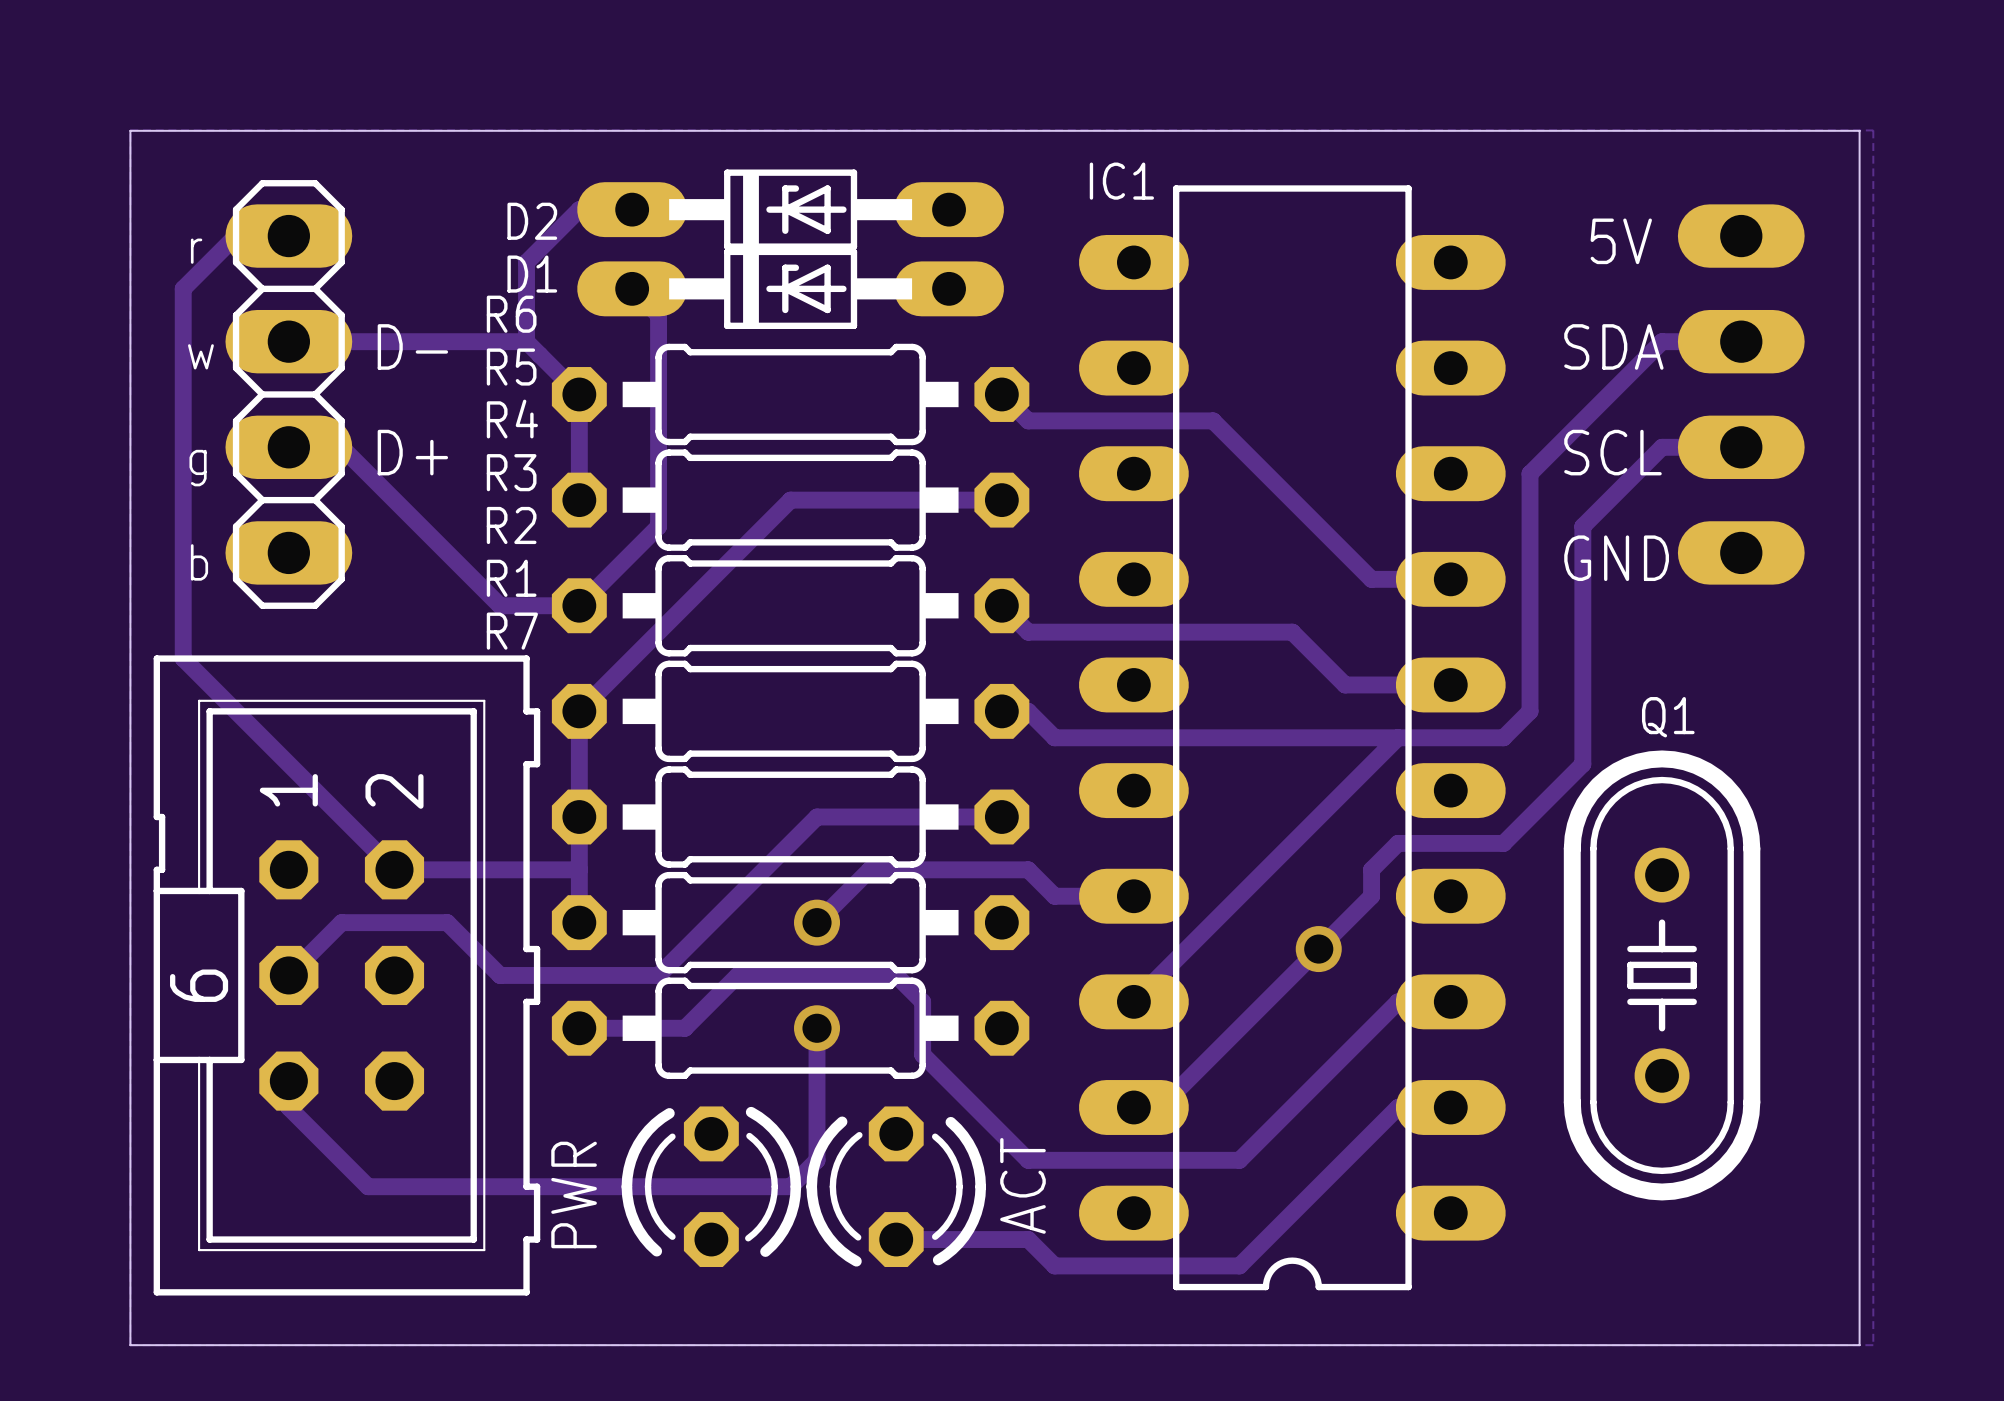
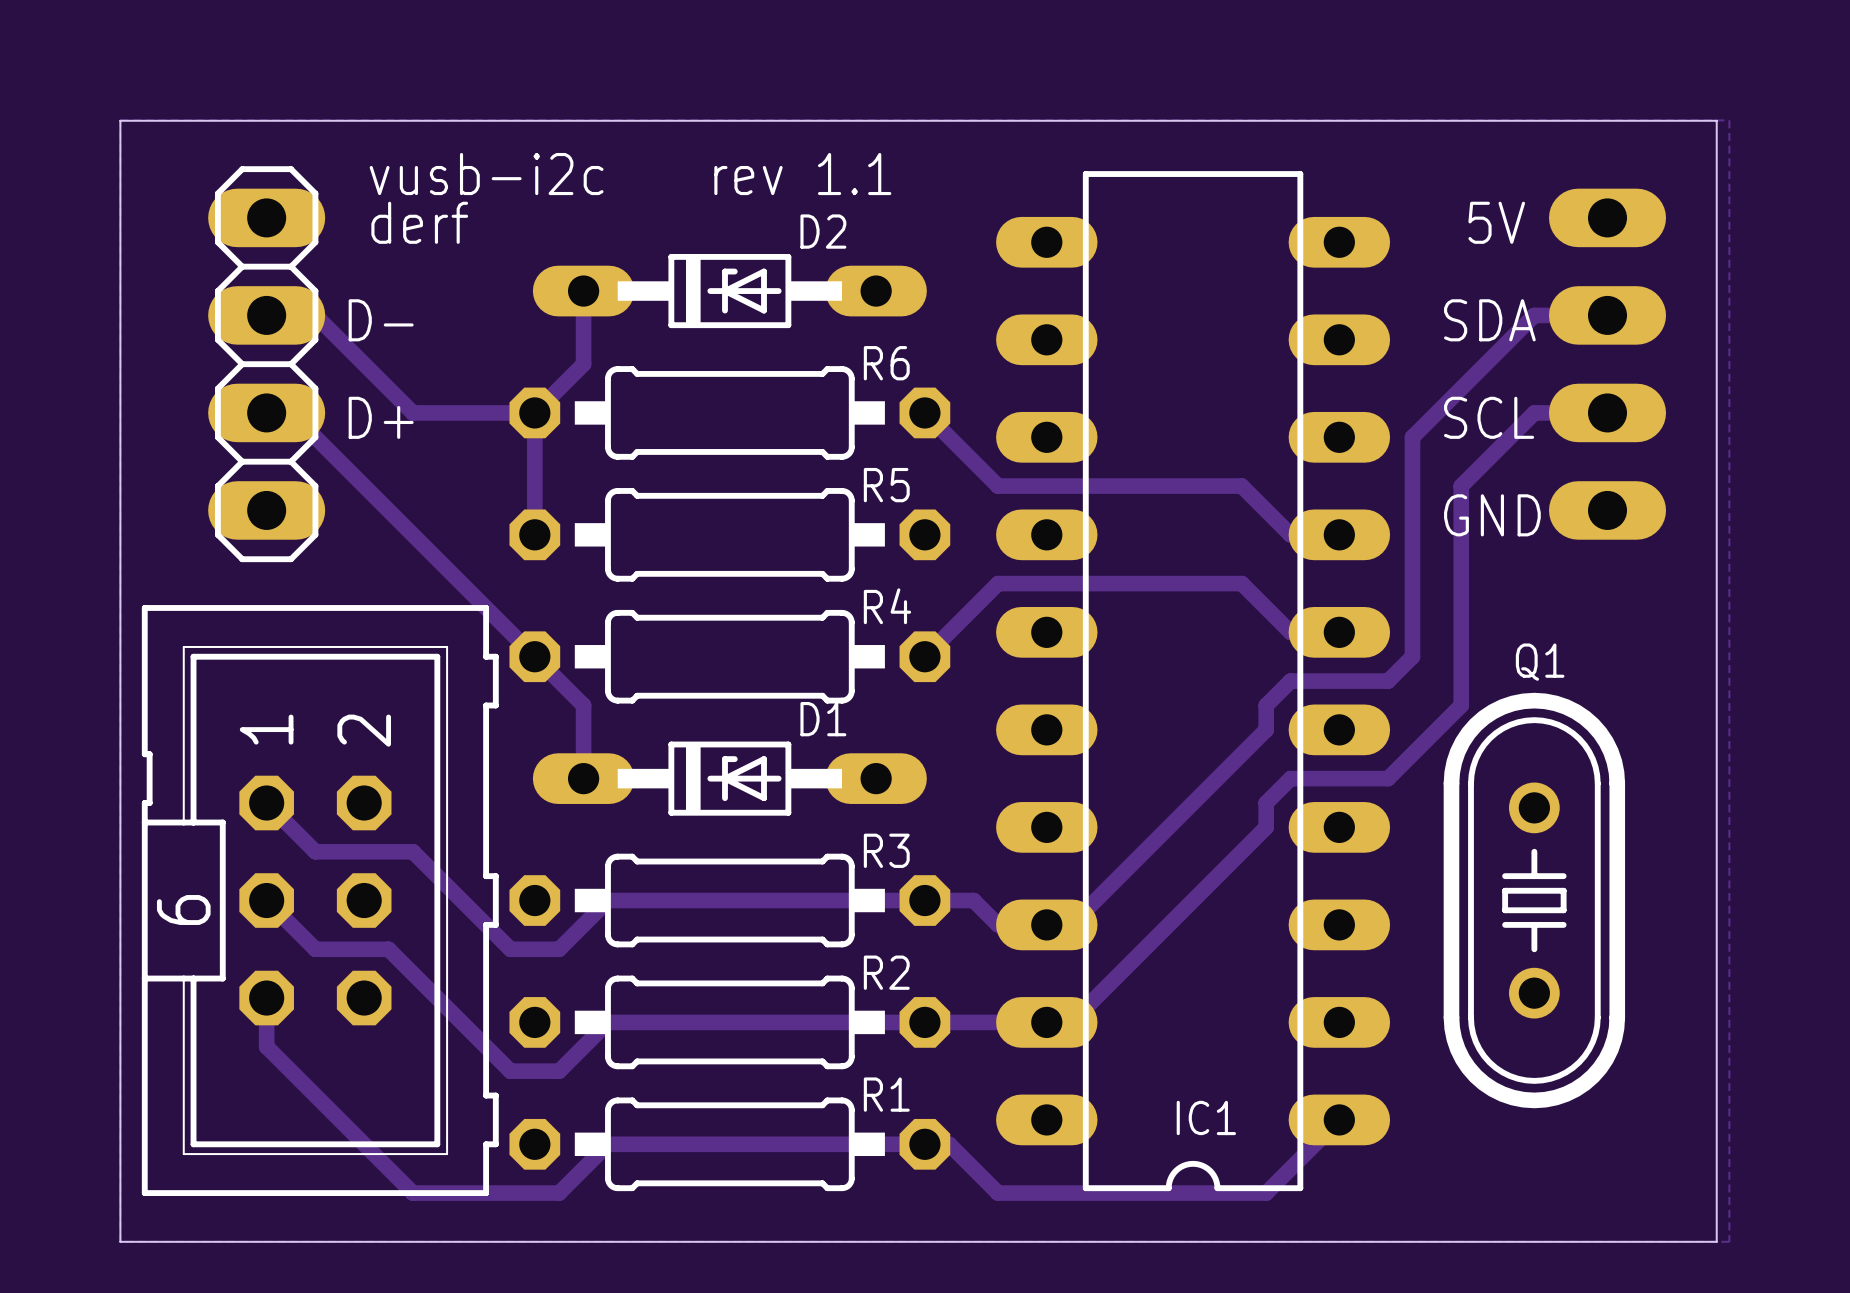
IC1 name position: IC1 (1121, 181) -> IC1 (1206, 1117)
text: none -> vusb-i2c (486, 174)
text: none -> rev 1.1 (802, 174)
track: (632, 209) (579, 209) (526, 262) (526, 341) -> none
D2 position: (790, 209) -> (729, 291)
D2 name position: D2 (532, 221) -> D2 (823, 231)
track: (288, 236) (236, 236) (183, 288) (183, 658) (394, 869) (579, 869) -> none
text: none -> derf (419, 222)
text: r (196, 251) -> none
D1 name position: D1 (532, 274) -> D1 (823, 719)
track: (632, 288) (658, 315) (658, 526) (579, 605) (500, 605) (341, 447) (315, 447) -> (583, 778) (583, 705) (291, 412)
D1 position: (790, 288) -> (729, 778)
R6 name position: R6 (511, 314) -> R6 (886, 363)
track: (341, 341) (526, 341) -> (315, 315) (412, 412) (534, 412) (583, 364) (583, 291)
track: (526, 341) (579, 394) (579, 447) -> none
text: w (200, 356) -> none
R5 name position: R5 (511, 367) -> R5 (886, 485)
R6 position: (790, 394) -> (729, 412)
track: (1001, 394) (1028, 420) (1213, 420) (1371, 579) (1397, 579) -> (924, 412) (998, 486) (1241, 486) (1290, 534)
text: g (198, 468) -> none
R3 name: R3 (511, 472) -> R4 (887, 606)
track: none -> (534, 461) (534, 534)
R5 position: (790, 500) -> (729, 534)
track: (1001, 500) (790, 500) (579, 711) (579, 922) -> none
R2 name position: R2 (511, 525) -> R2 (886, 972)
text: b (199, 562) -> none
R1 name position: R1 (511, 578) -> R1 (886, 1094)
R4: (790, 605) -> none
track: (1001, 605) (1028, 632) (1081, 632) -> (924, 656) (998, 583)
track: (1292, 632) (1345, 684) (1397, 684) -> (1193, 583) (1241, 583) (1290, 632)
track: (1001, 711) (1028, 711) (1054, 737) (1397, 737) -> none
track: (1371, 764) (1133, 1001) -> (1266, 705) (1266, 729) (1071, 924) (998, 924) (973, 900) (827, 900)
R2 position: (790, 817) -> (729, 1022)
track: (1001, 817) (817, 817) (658, 975) (500, 975) -> (534, 949) (510, 949) (461, 900)
track: (1133, 896) (1054, 896) (1028, 869) (869, 869) (817, 922) -> none
track: (341, 922) (288, 975) -> (315, 851) (266, 803)
R1 position: (790, 922) -> (729, 1144)
via: (817, 922) -> none
via: (1318, 949) -> none
track: none -> (266, 900) (315, 949) (388, 949) (510, 1071) (559, 1071) (607, 1022) (1046, 1022)
track: (737, 975) (684, 1028) (605, 1028) -> (681, 900) (607, 900) (559, 949)
R3: none -> (729, 900)
track: (896, 975) (922, 1001) (922, 1054) (1028, 1160) (1239, 1160) (1397, 1001) (1450, 1001) -> none
R7: (790, 1028) -> none
track: (817, 1028) (817, 1160) (790, 1186) (368, 1186) (288, 1107) -> (827, 1144) (607, 1144) (559, 1193) (412, 1193) (266, 1046) (266, 1022)
via: (817, 1028) -> none
track: (1450, 1107) (1397, 1107) (1239, 1265) (1054, 1265) -> (1339, 1119) (1266, 1193) (998, 1193) (973, 1168)
text: ACT (1022, 1185) -> none
part: (711, 1186) -> none
part: (896, 1186) -> none
text: PWR (574, 1194) -> none

